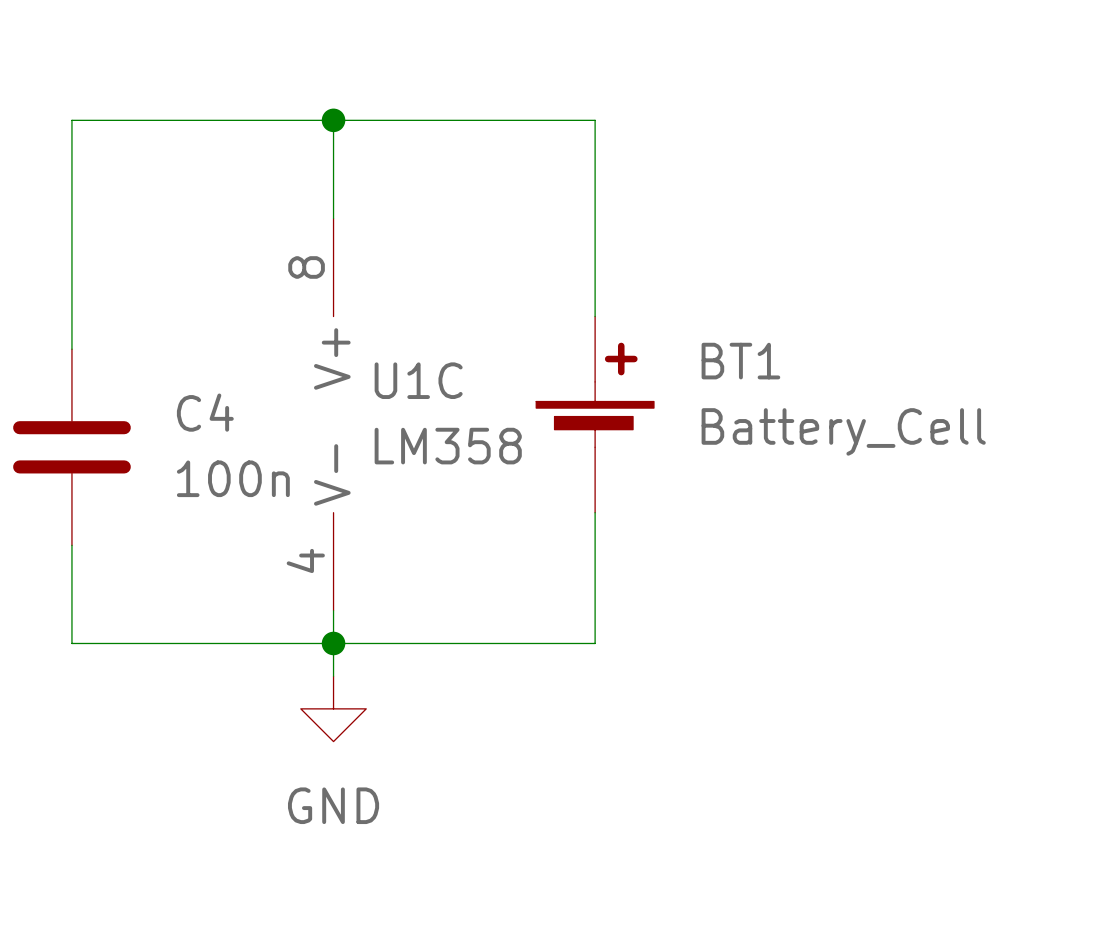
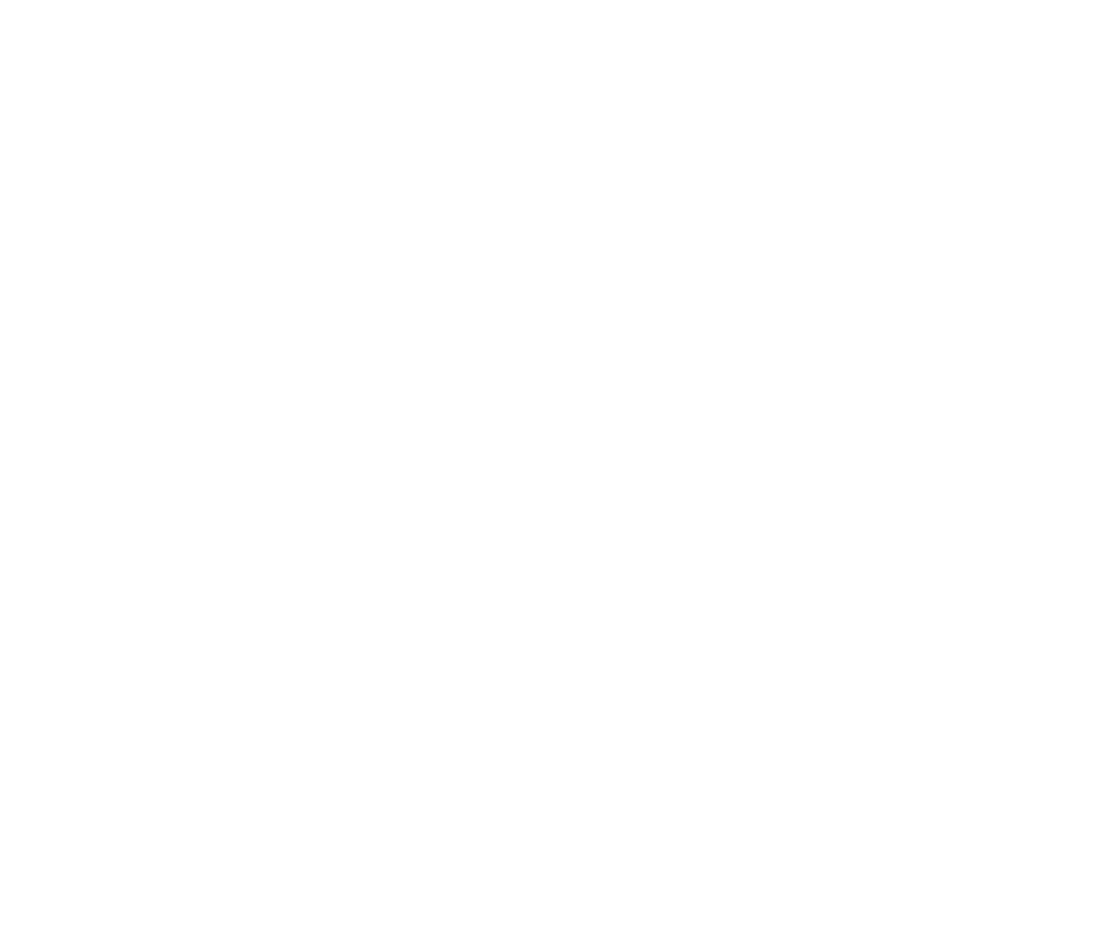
wire: (333, 120) (333, 218) -> none
junction: (333, 120) -> none
wire: (595, 316) (595, 120) (71, 120) (71, 349) -> none
U1C: LM358 (333, 414) -> none
BT1: Battery_Cell (595, 414) -> none
C4: 100n (71, 447) -> none
wire: (595, 512) (595, 643) (71, 643) (71, 545) -> none
wire: (333, 610) (333, 676) -> none
junction: (333, 643) -> none
power symbol: GND (333, 708) -> none

